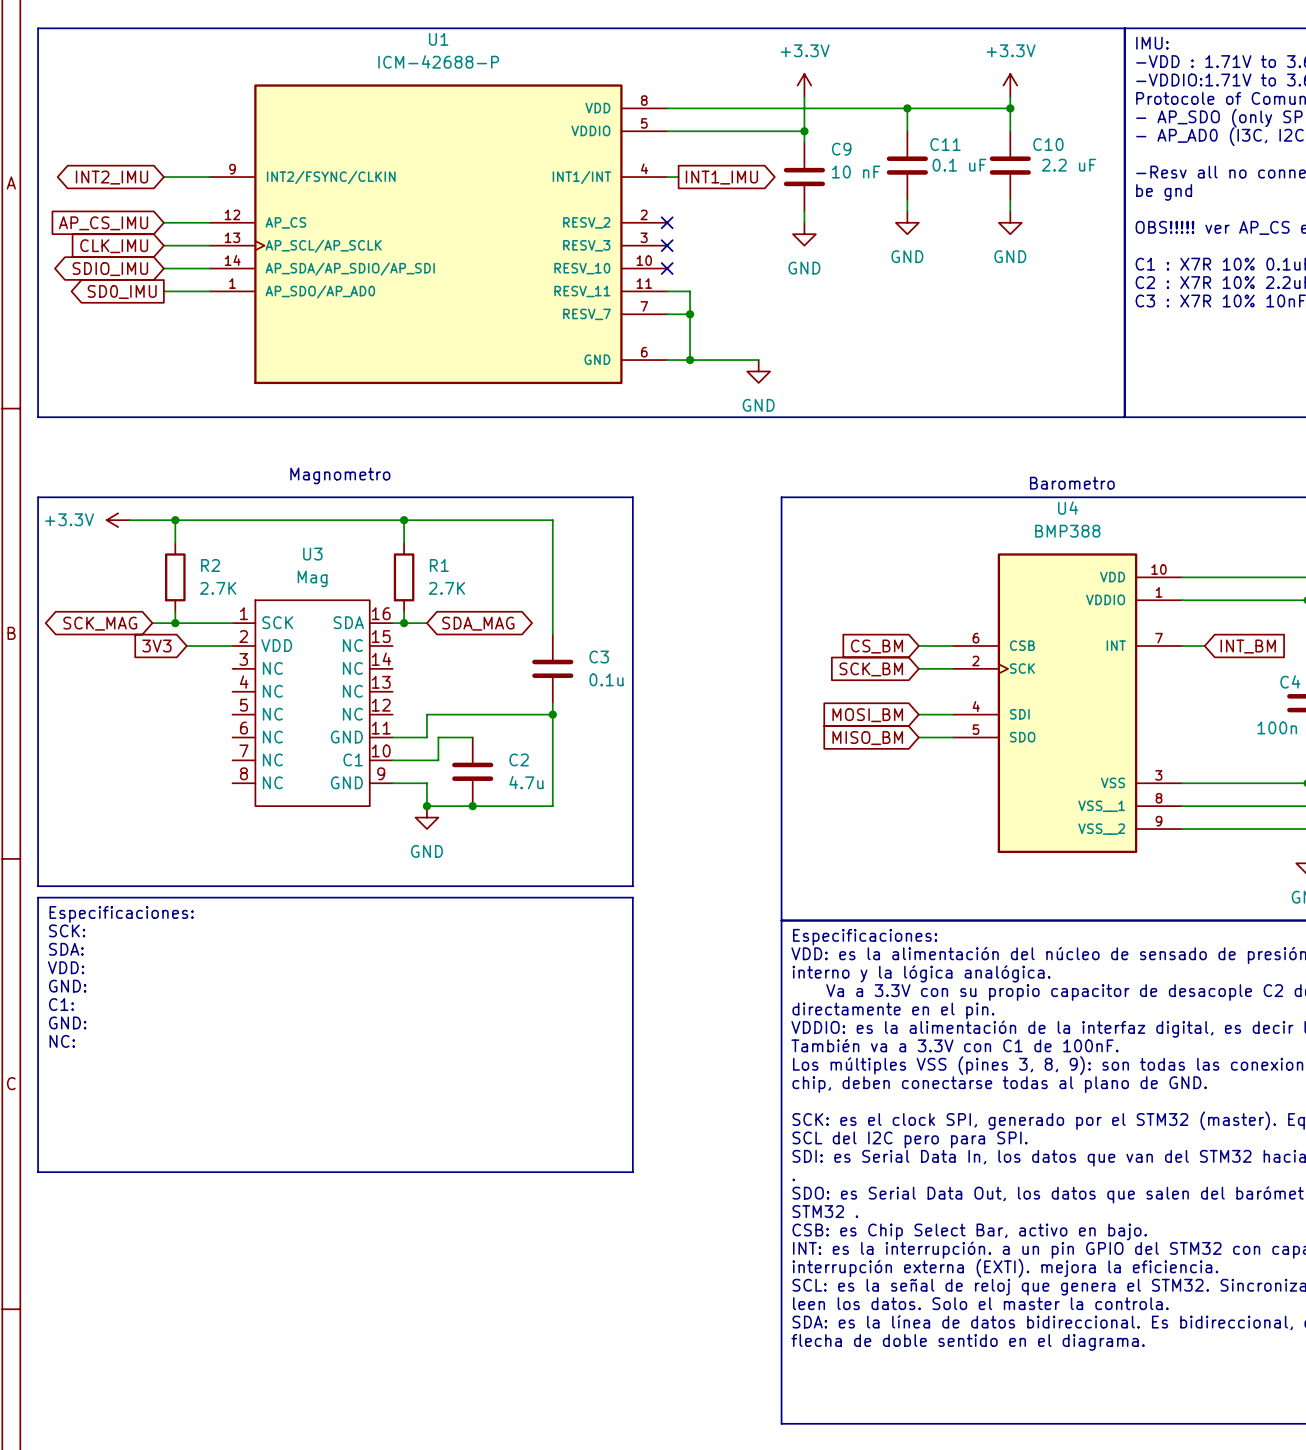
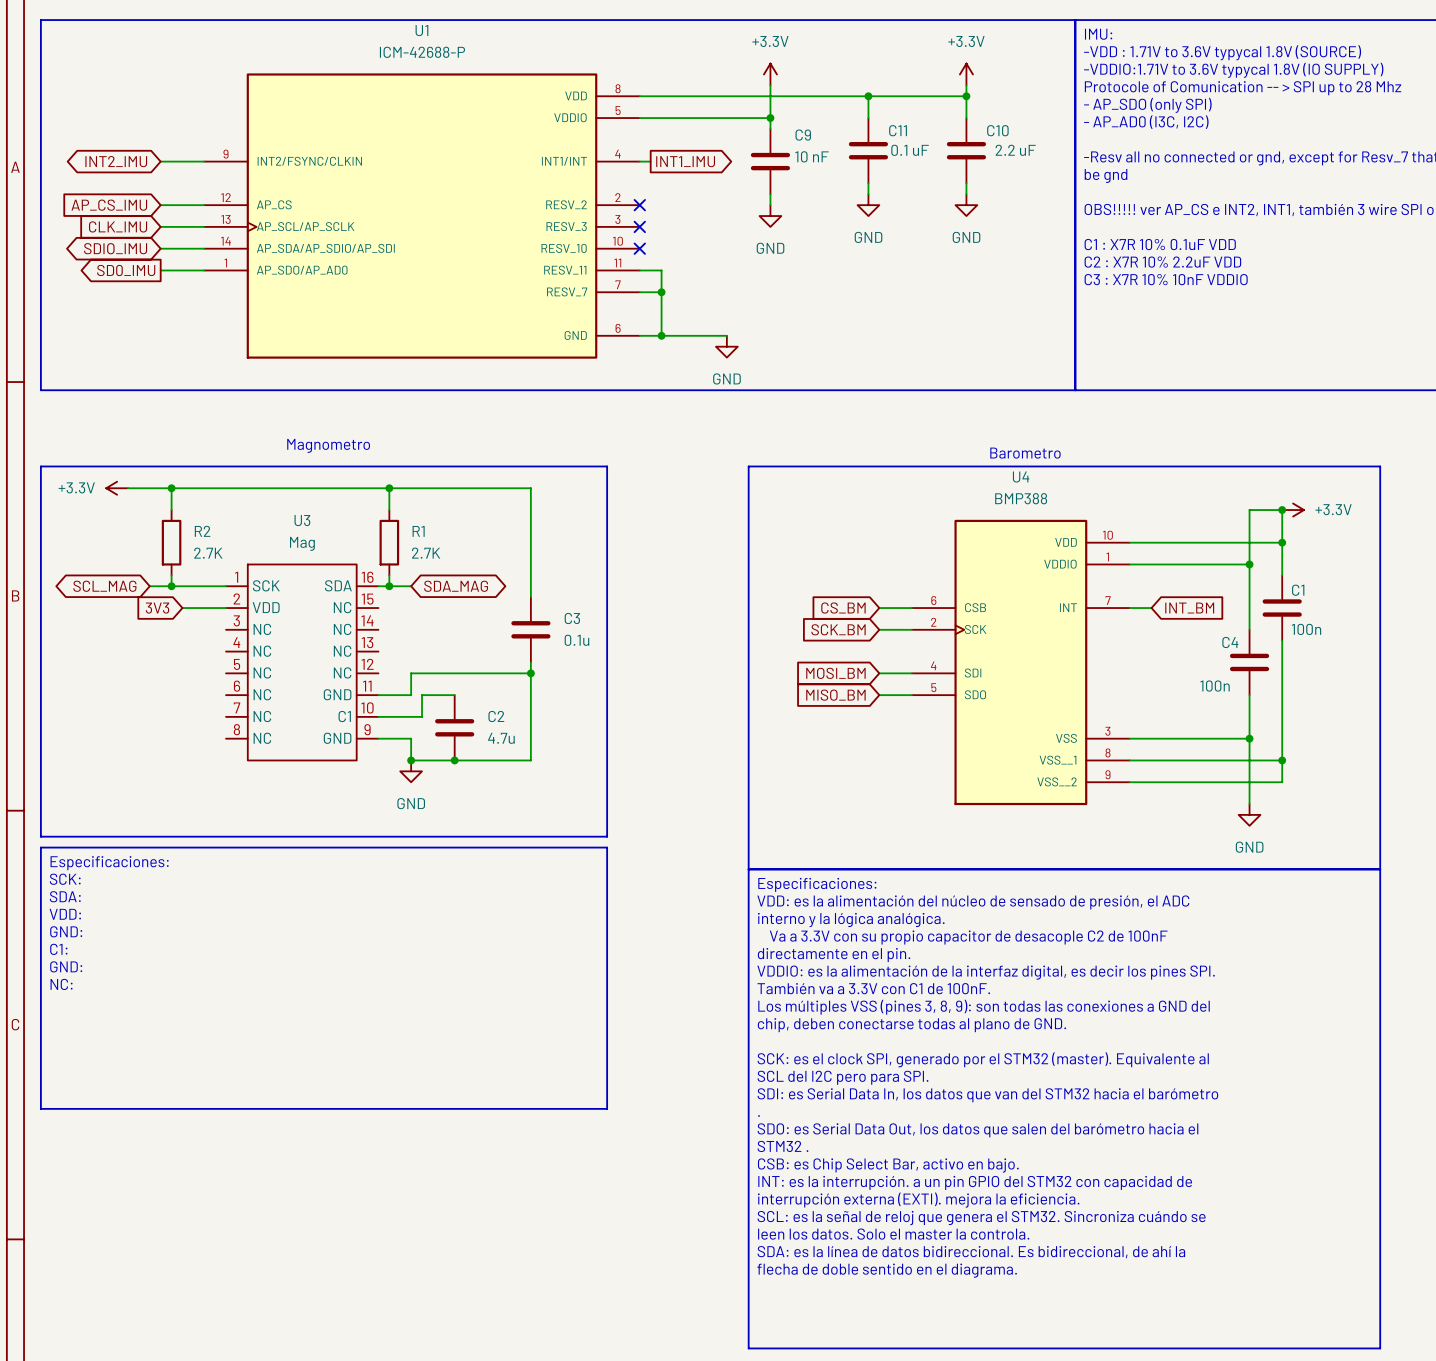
global label: SCK_MAG (100, 623) -> SCL_MAG (104, 586)

